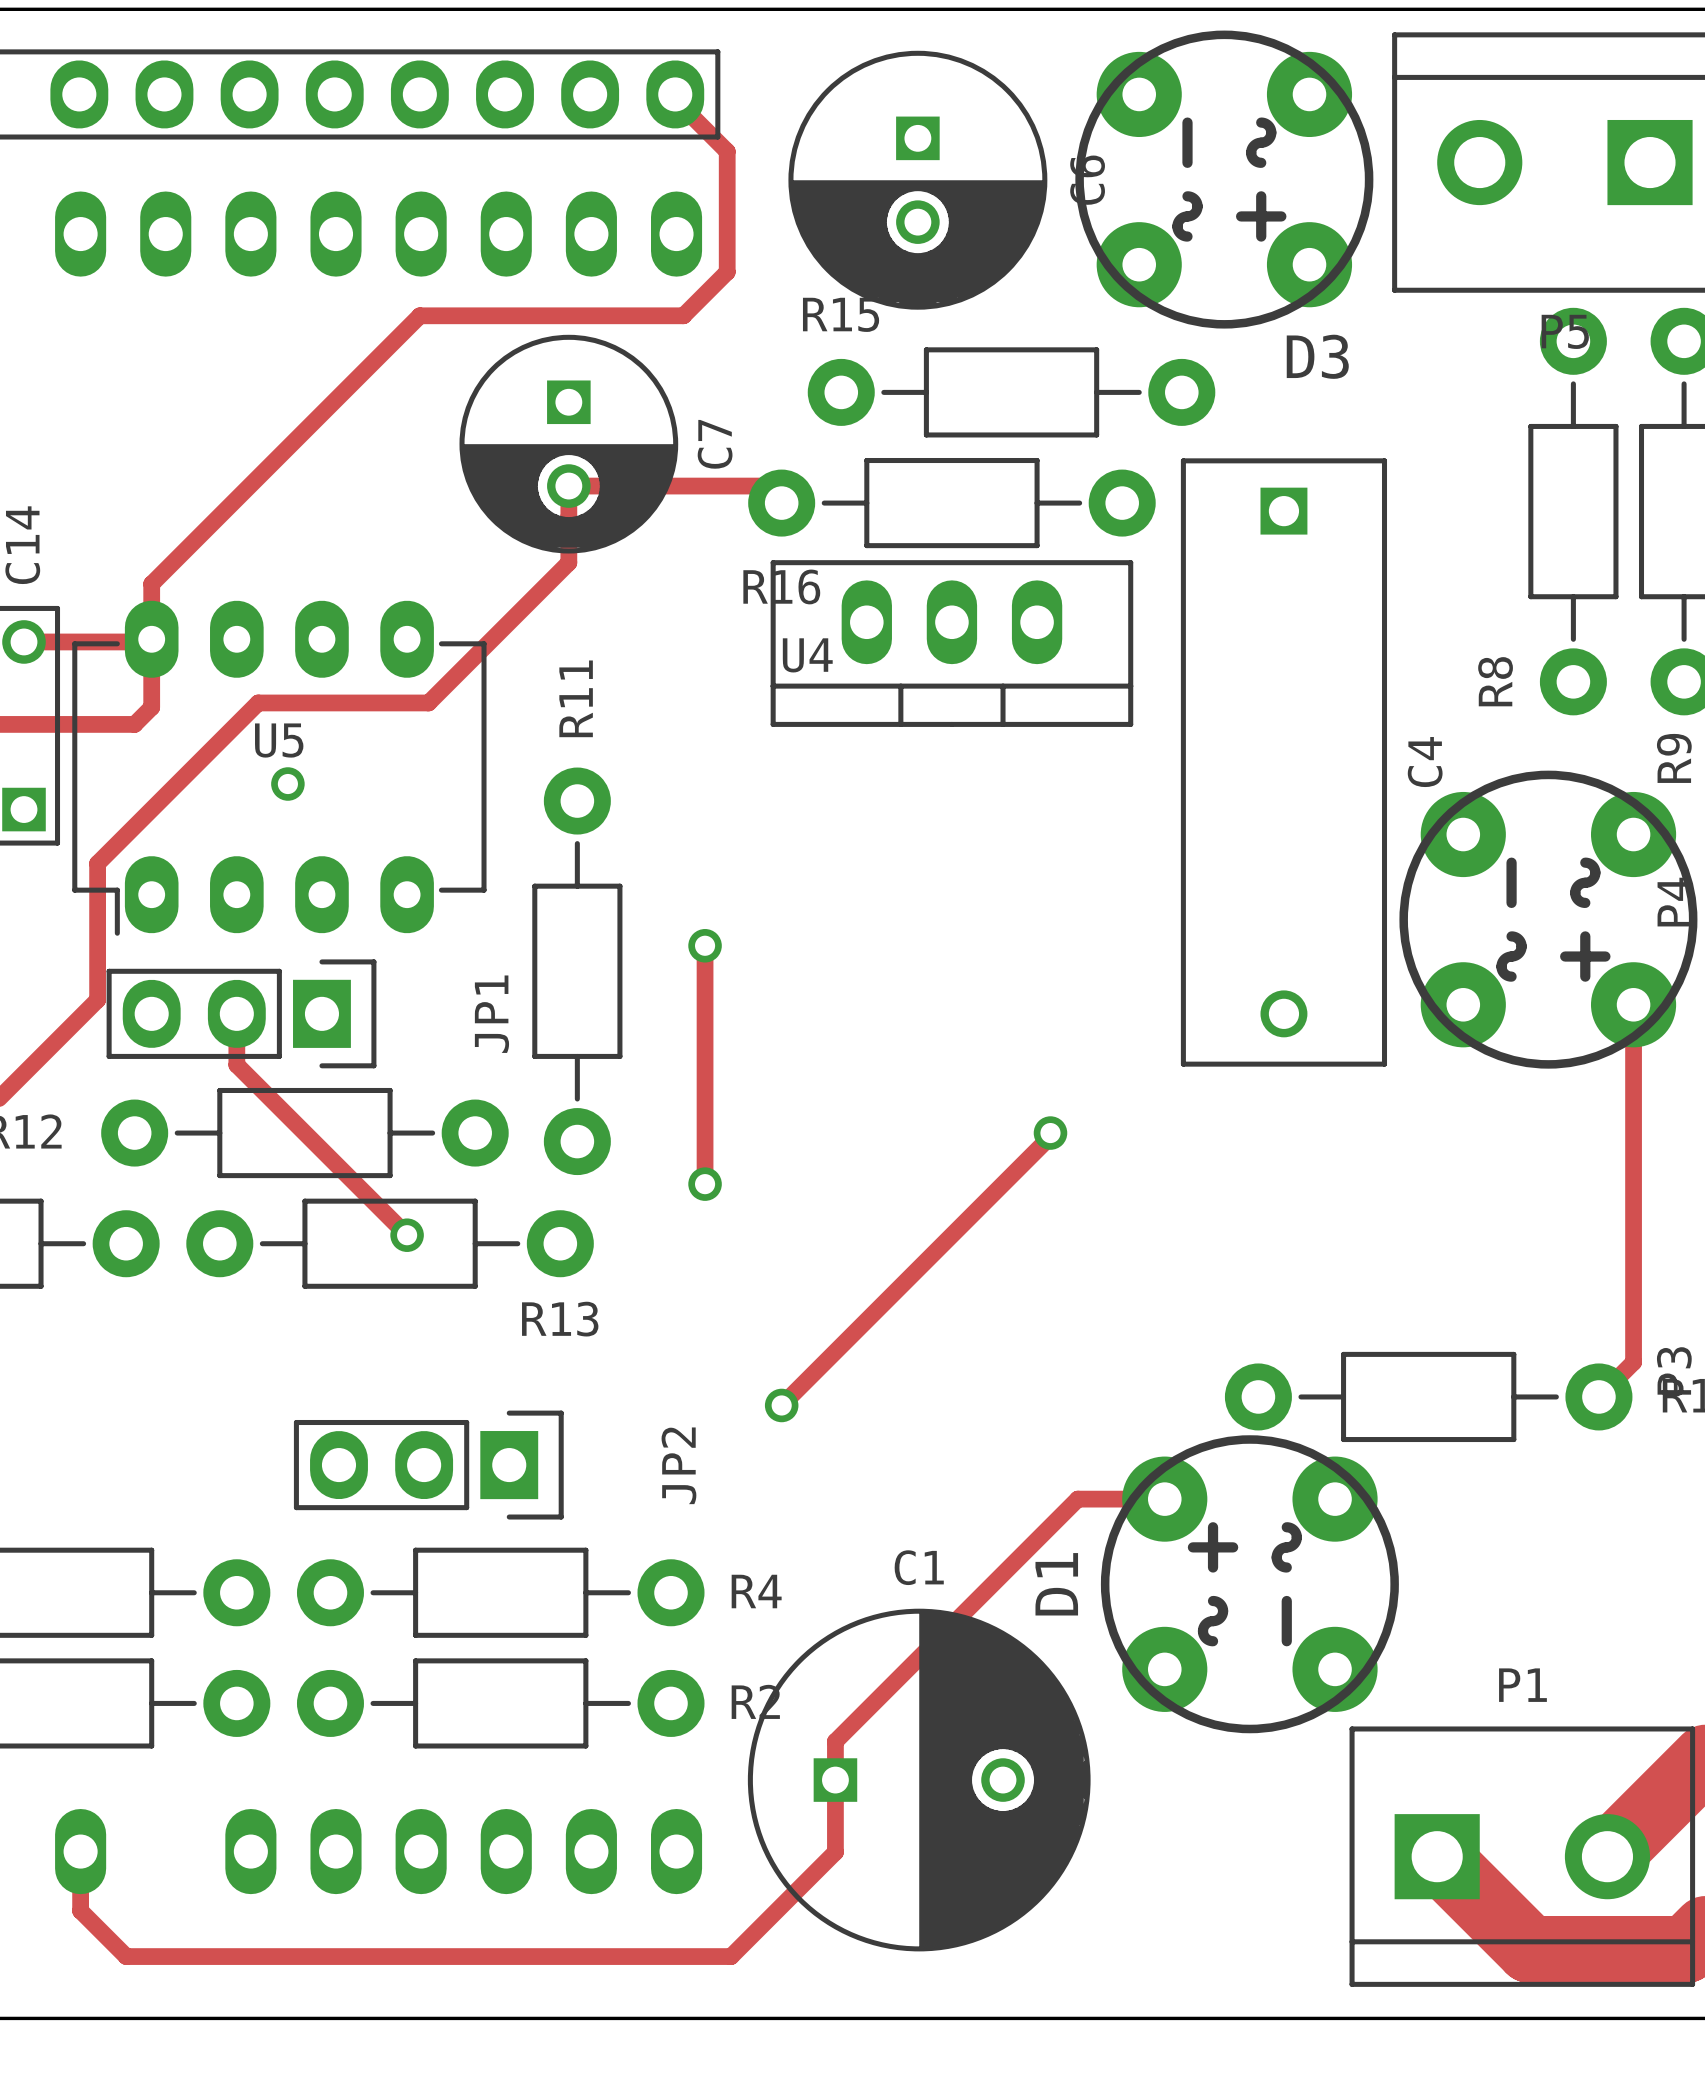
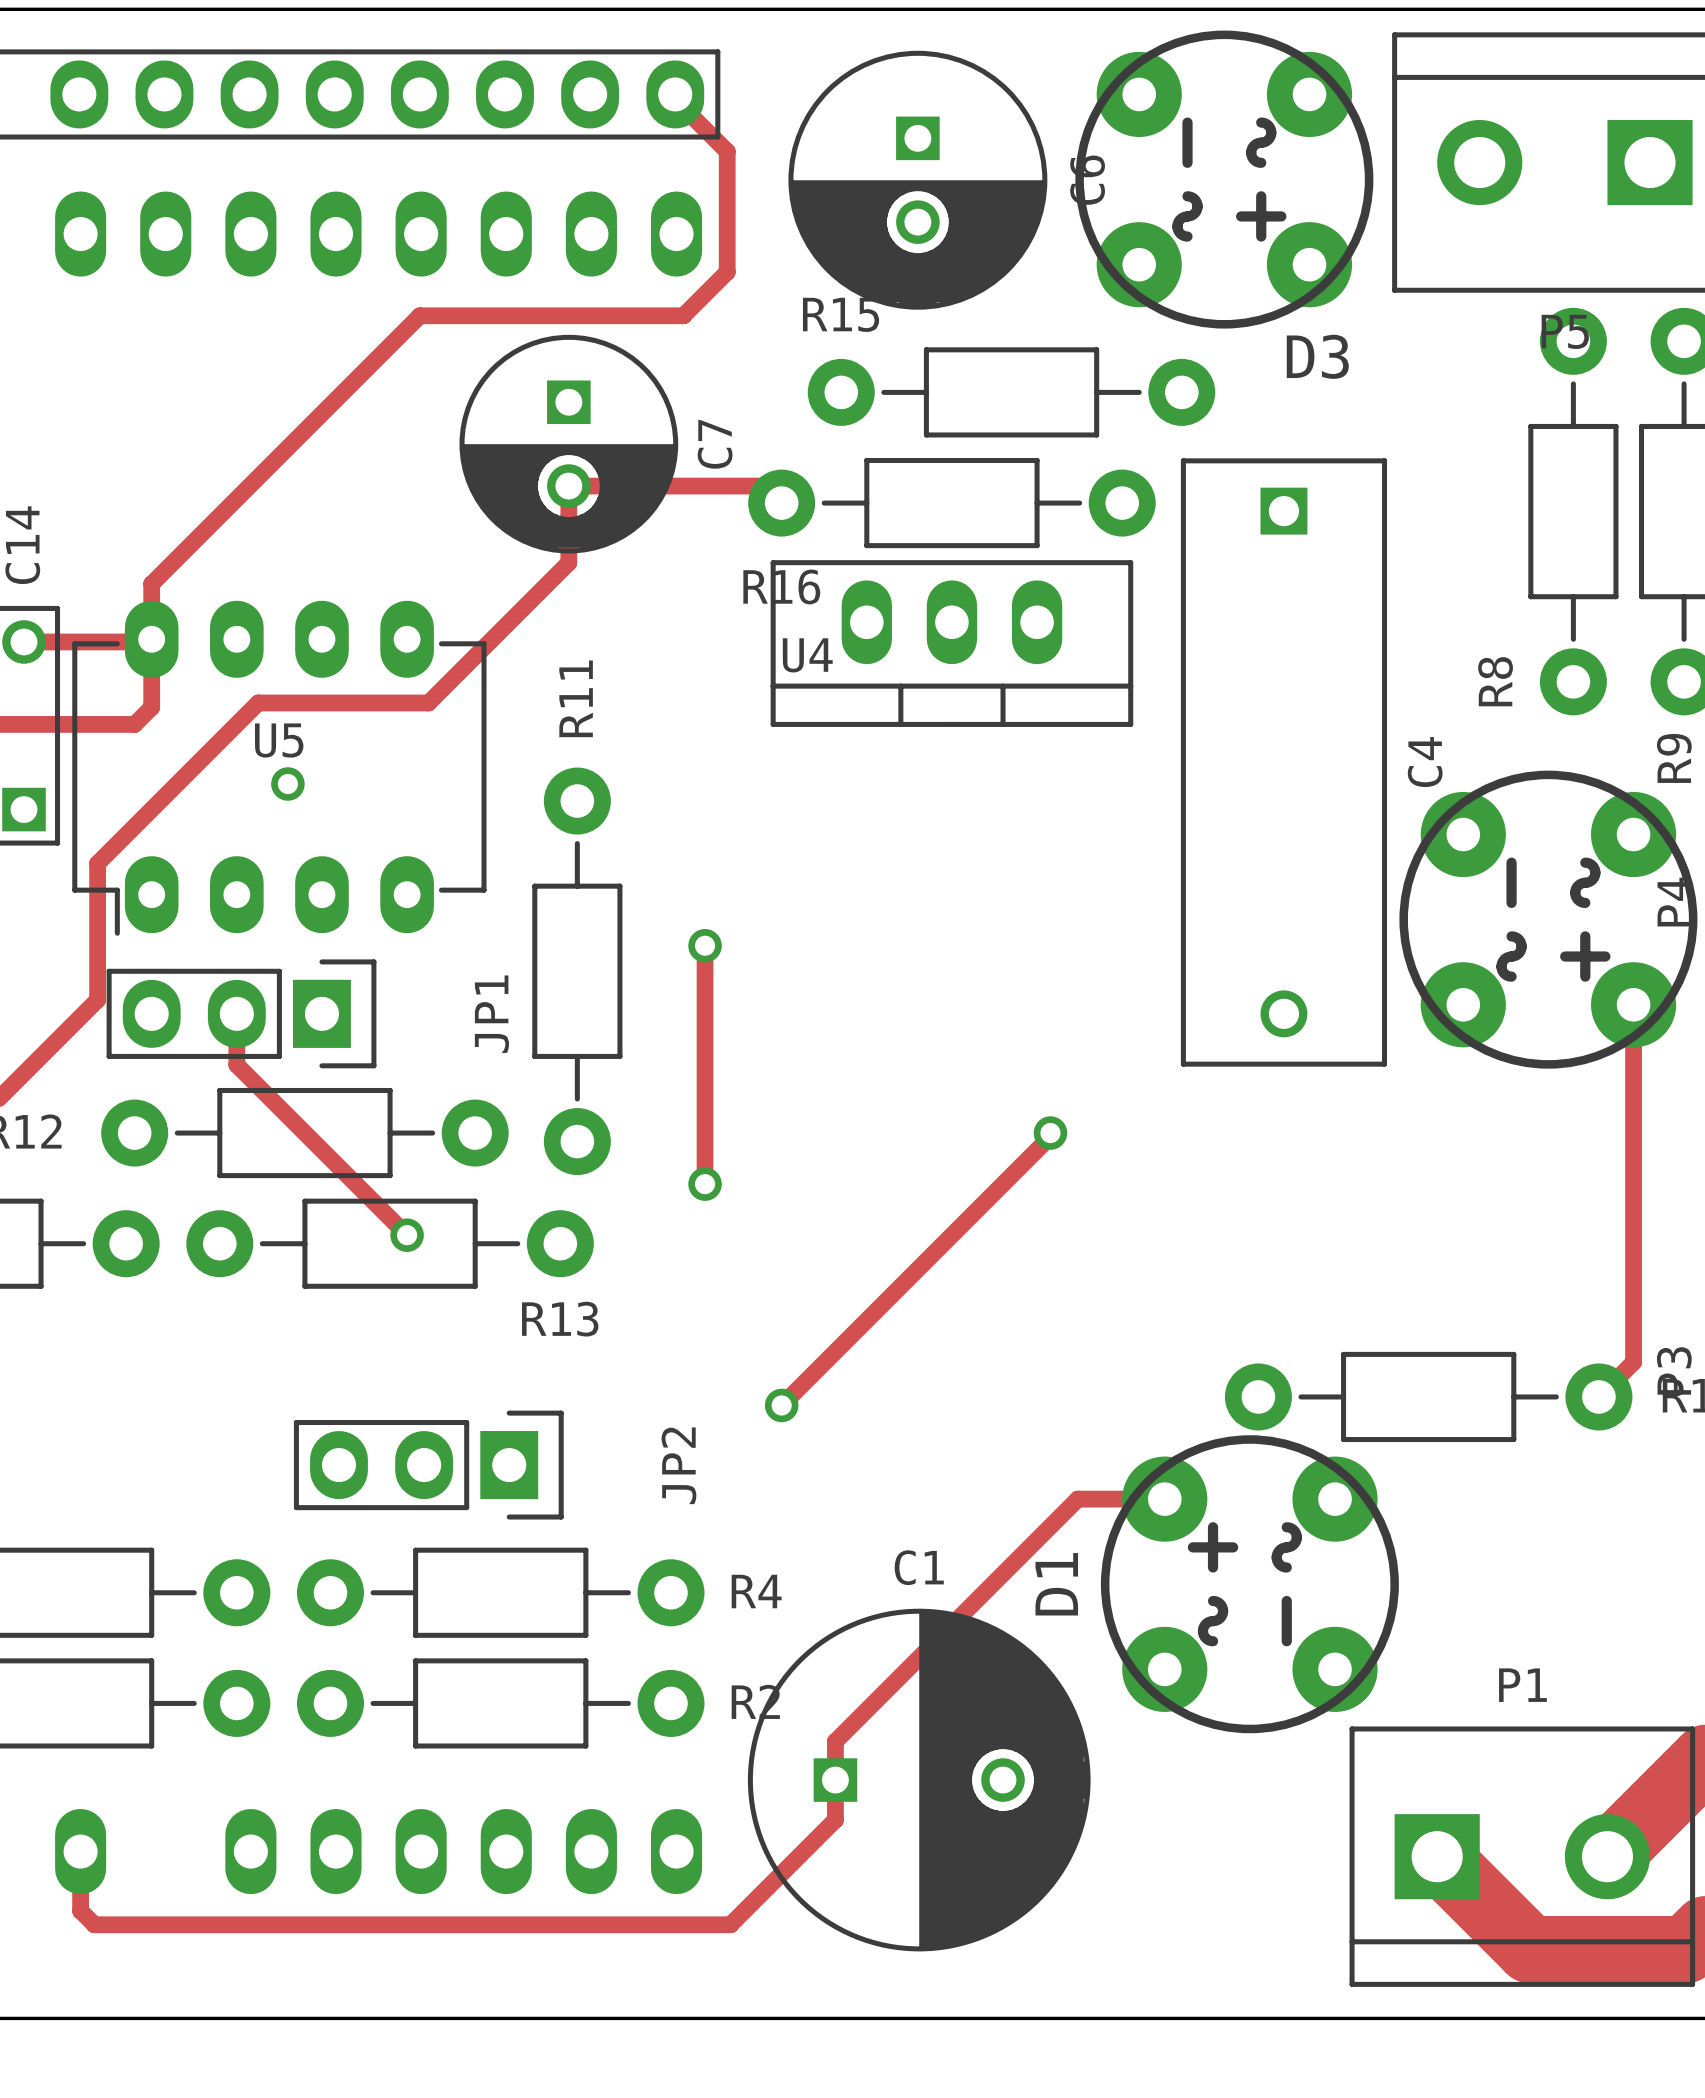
track: (835, 1819) (835, 1852) (731, 1956) (126, 1956) (94, 1924) -> (835, 1819) (730, 1924) (94, 1924)

